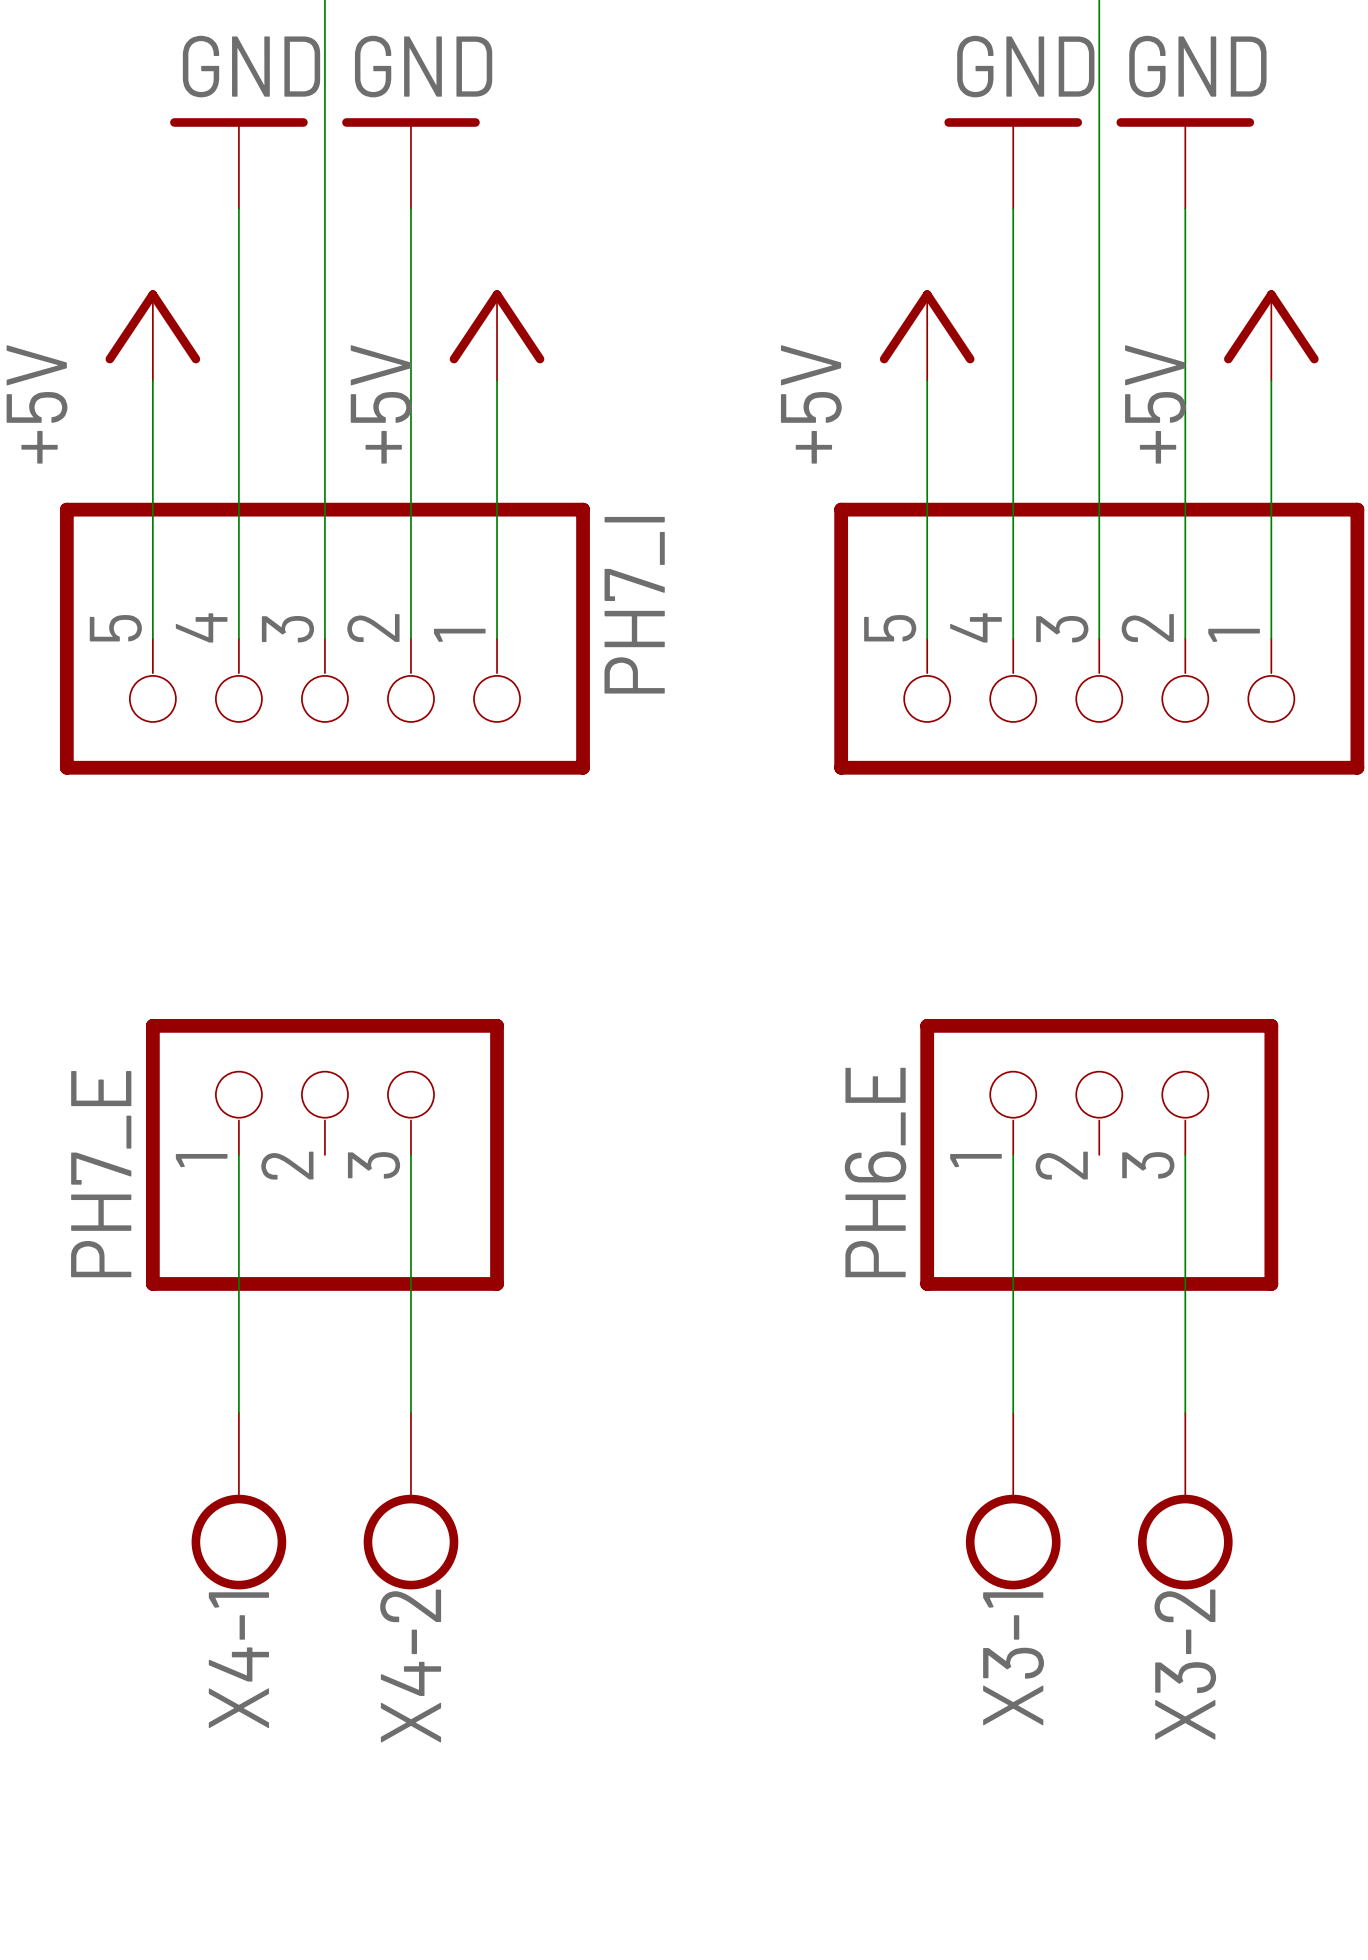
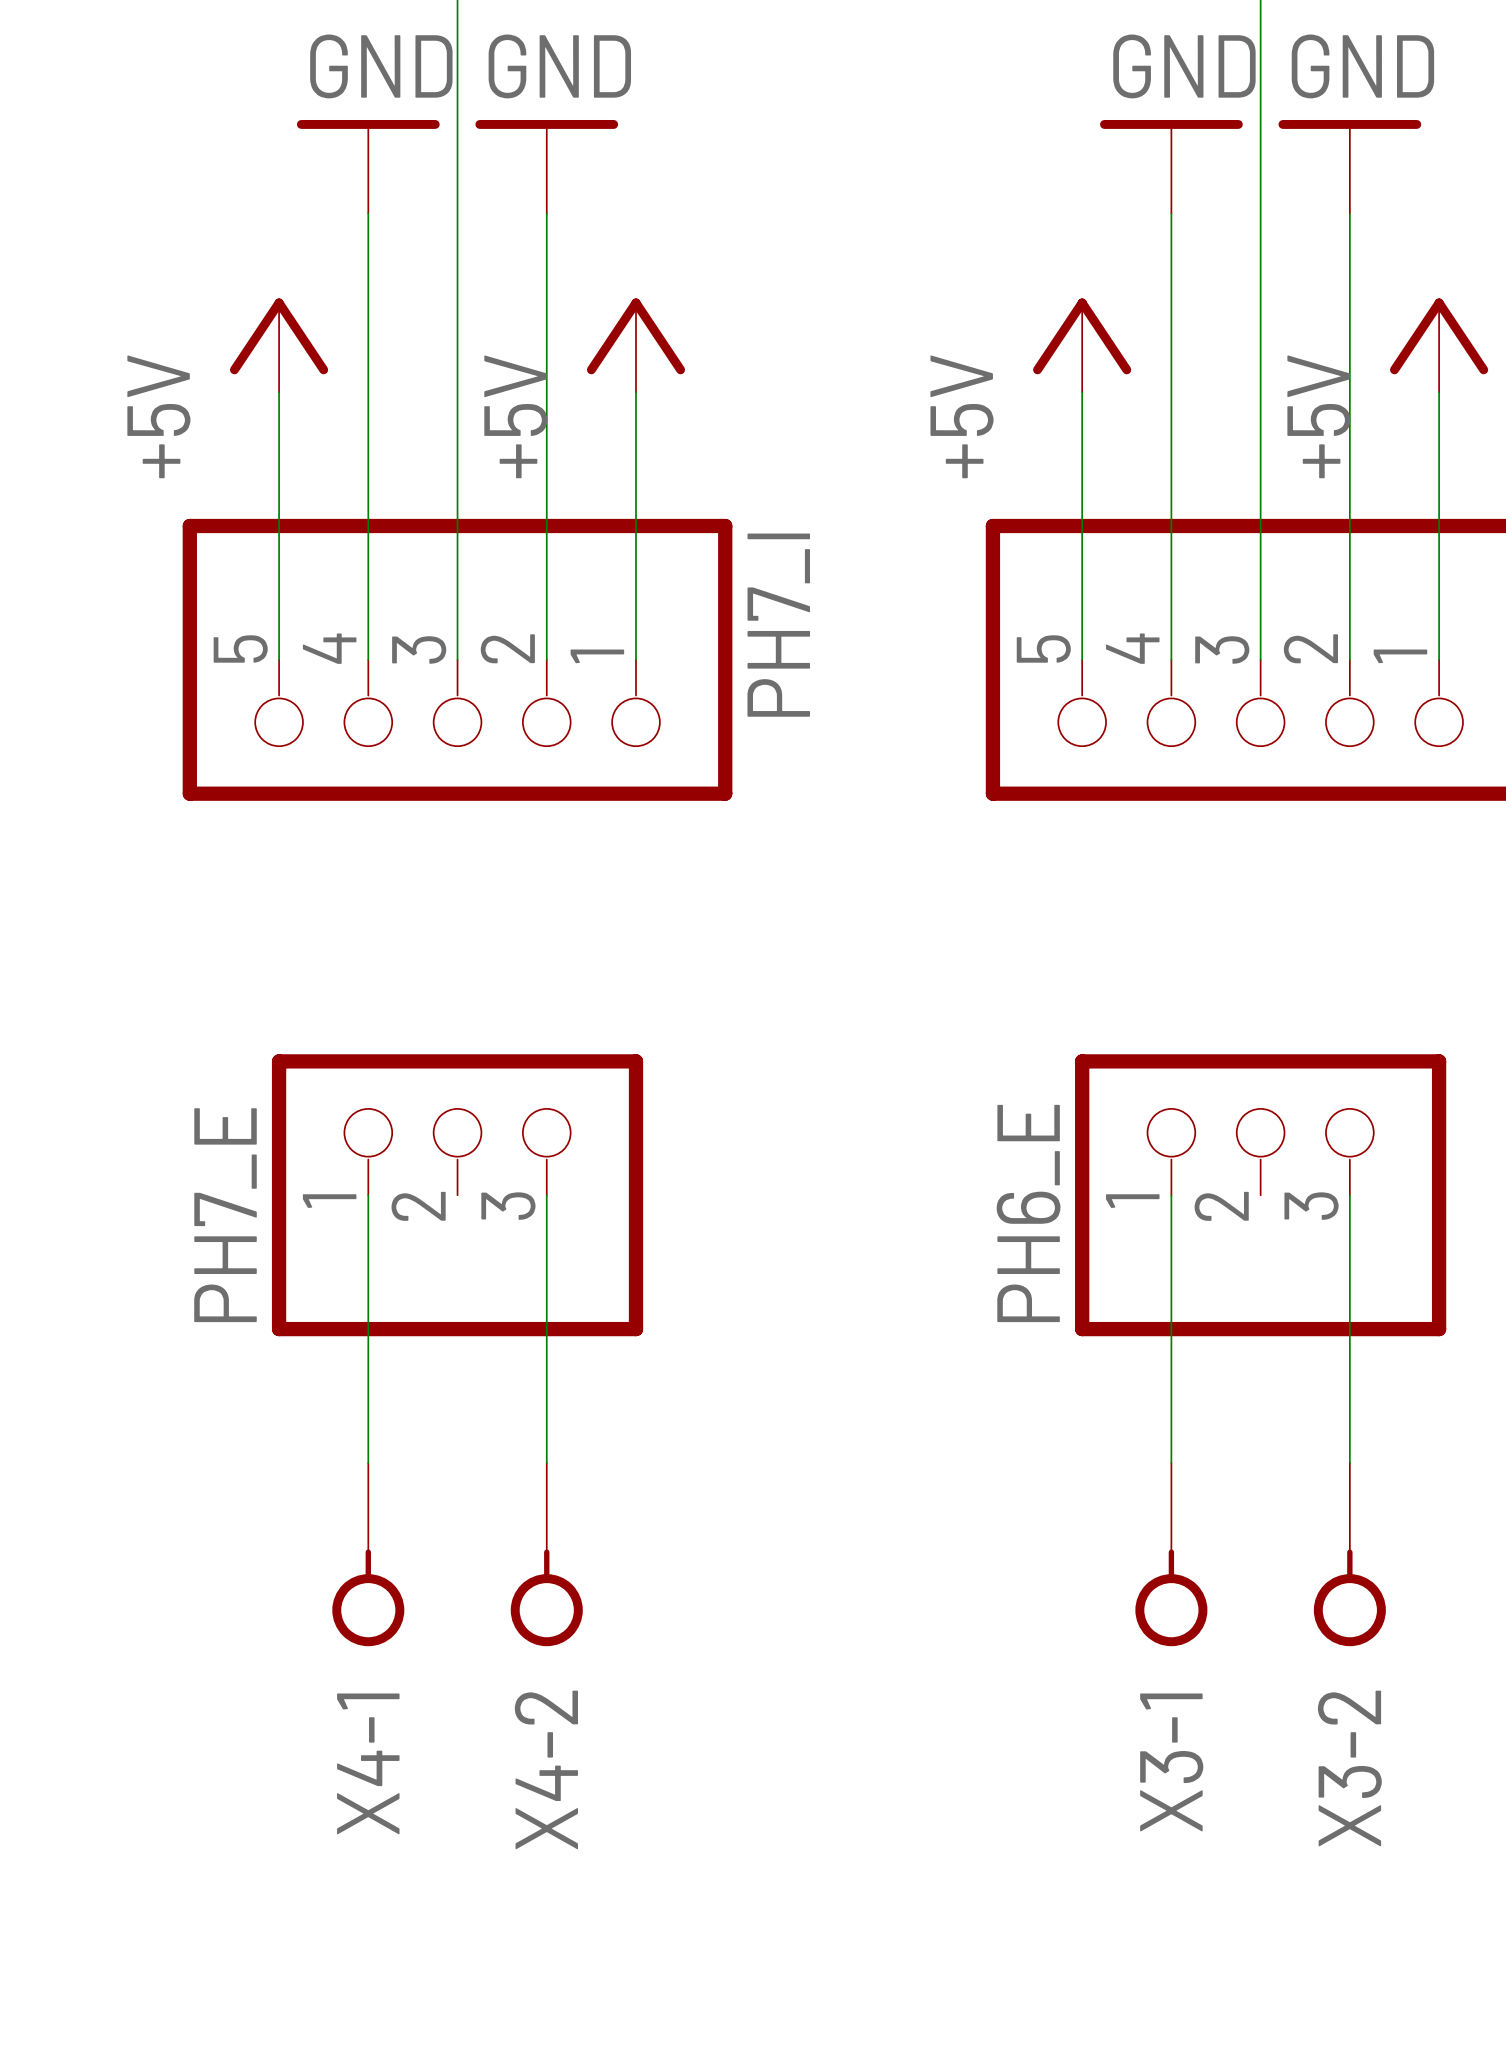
X4-1 symbol: [191, 1413, 287, 1590] -> [332, 1462, 405, 1647]
X4-2 symbol: [363, 1413, 459, 1590] -> [510, 1462, 583, 1647]
X3-1 symbol: [965, 1413, 1061, 1590] -> [1135, 1462, 1208, 1647]
X3-2 symbol: [1137, 1413, 1233, 1590] -> [1313, 1462, 1386, 1647]
X3-1 name position: X3-1 (1013, 1658) -> X3-1 (1171, 1762)
X4-1 name position: X4-1 (238, 1660) -> X4-1 (368, 1763)
X3-2 name position: X3-2 (1185, 1664) -> X3-2 (1349, 1768)
X4-2 name position: X4-2 (410, 1666) -> X4-2 (546, 1769)

